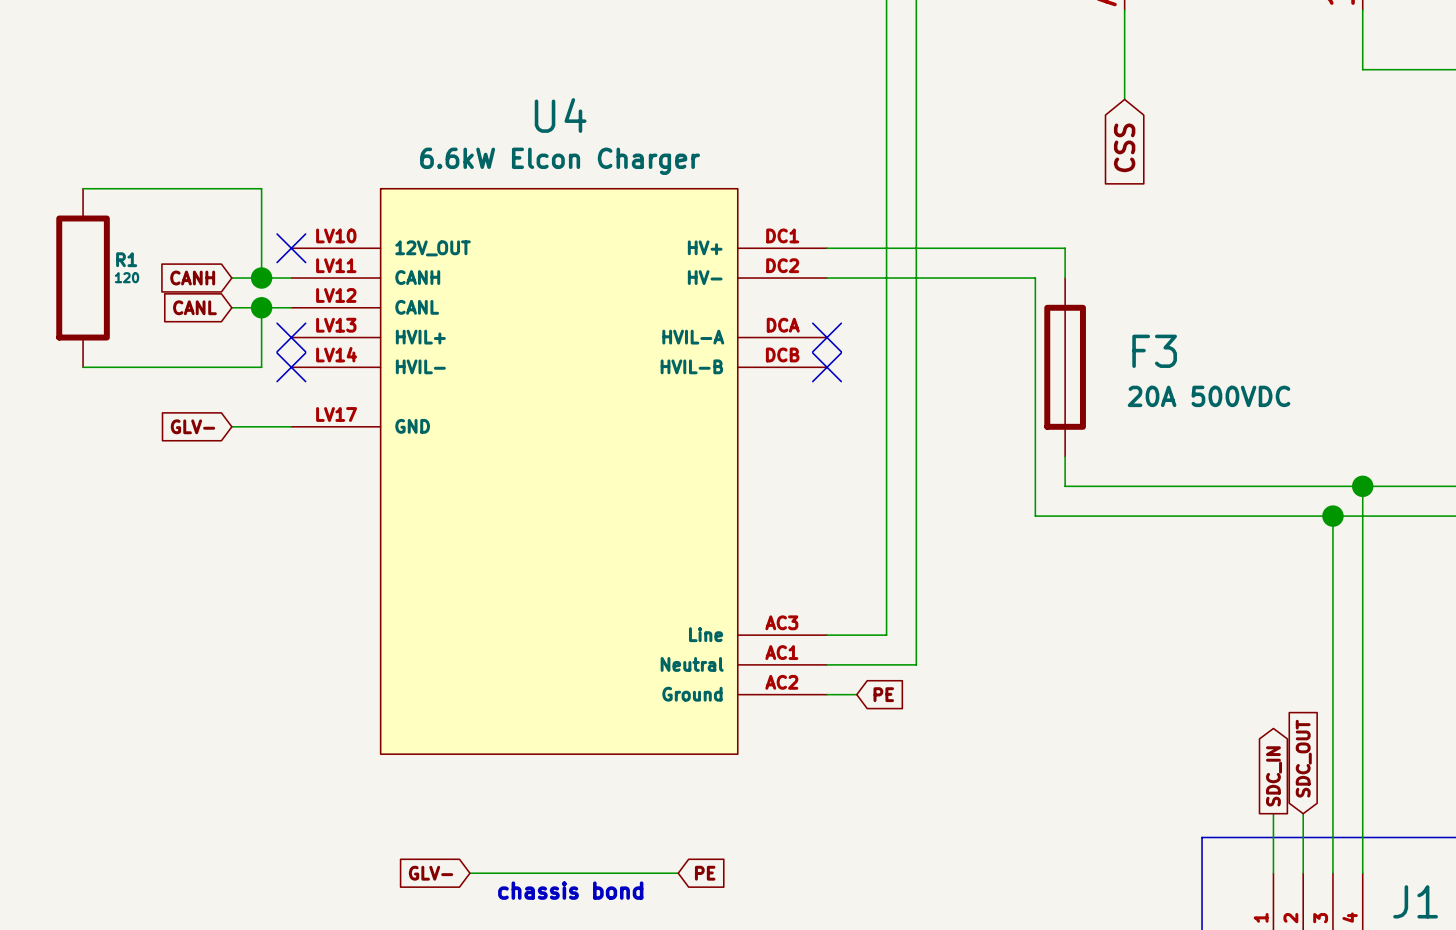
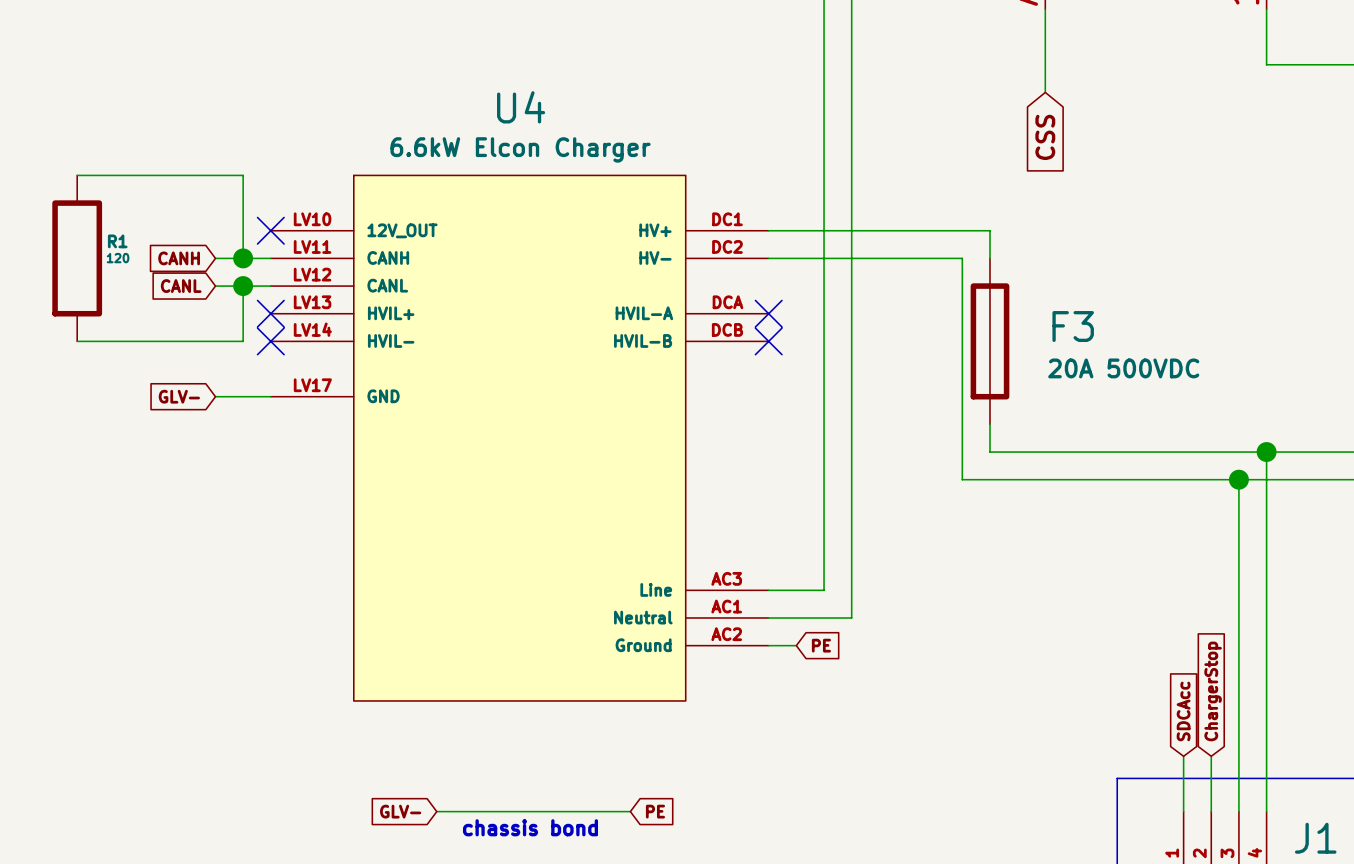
global label: SDC_OUT (1303, 758) -> ChargerStop (1213, 691)
global label shape: output (1274, 776) -> input (1183, 711)
global label: SDC_IN (1274, 776) -> SDCAcc (1183, 711)

